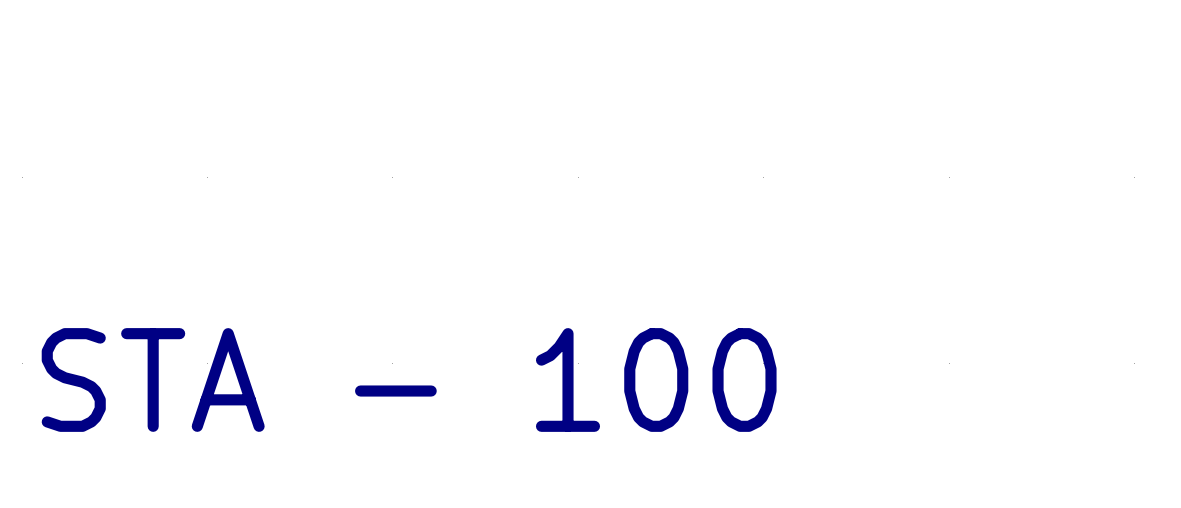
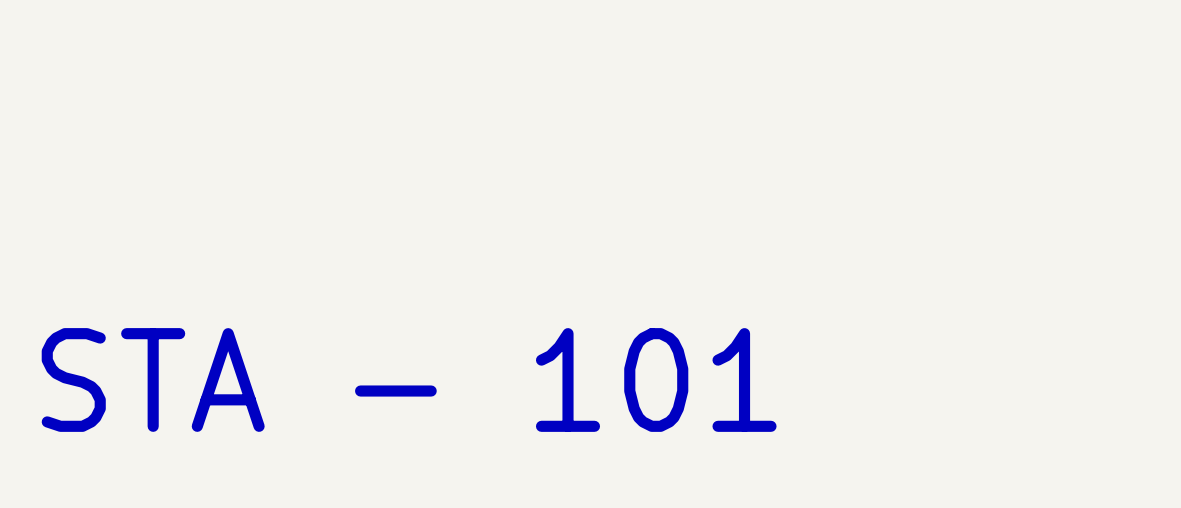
text: STA - 100 (409, 379) -> STA - 101 (409, 379)

